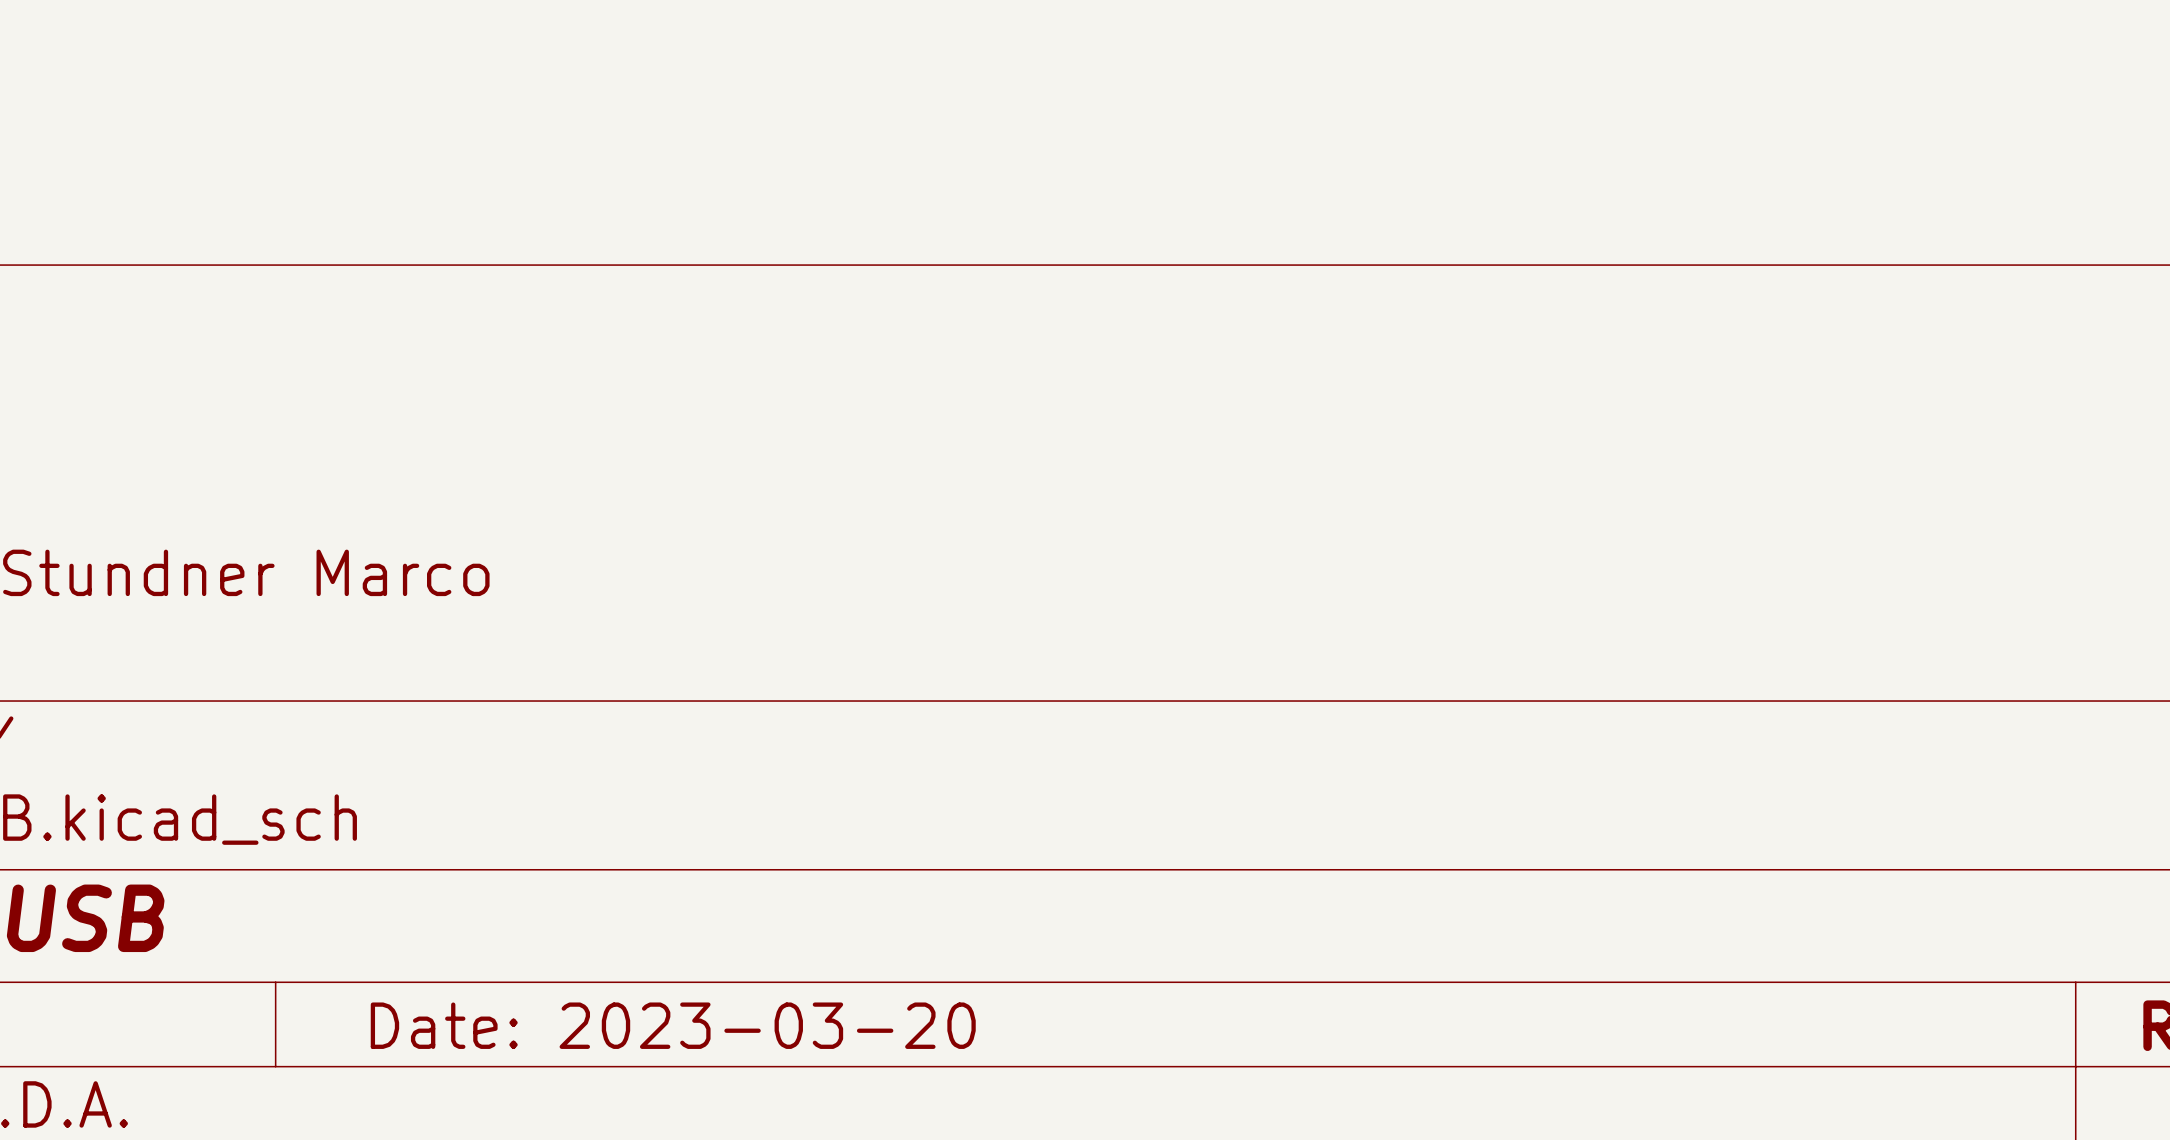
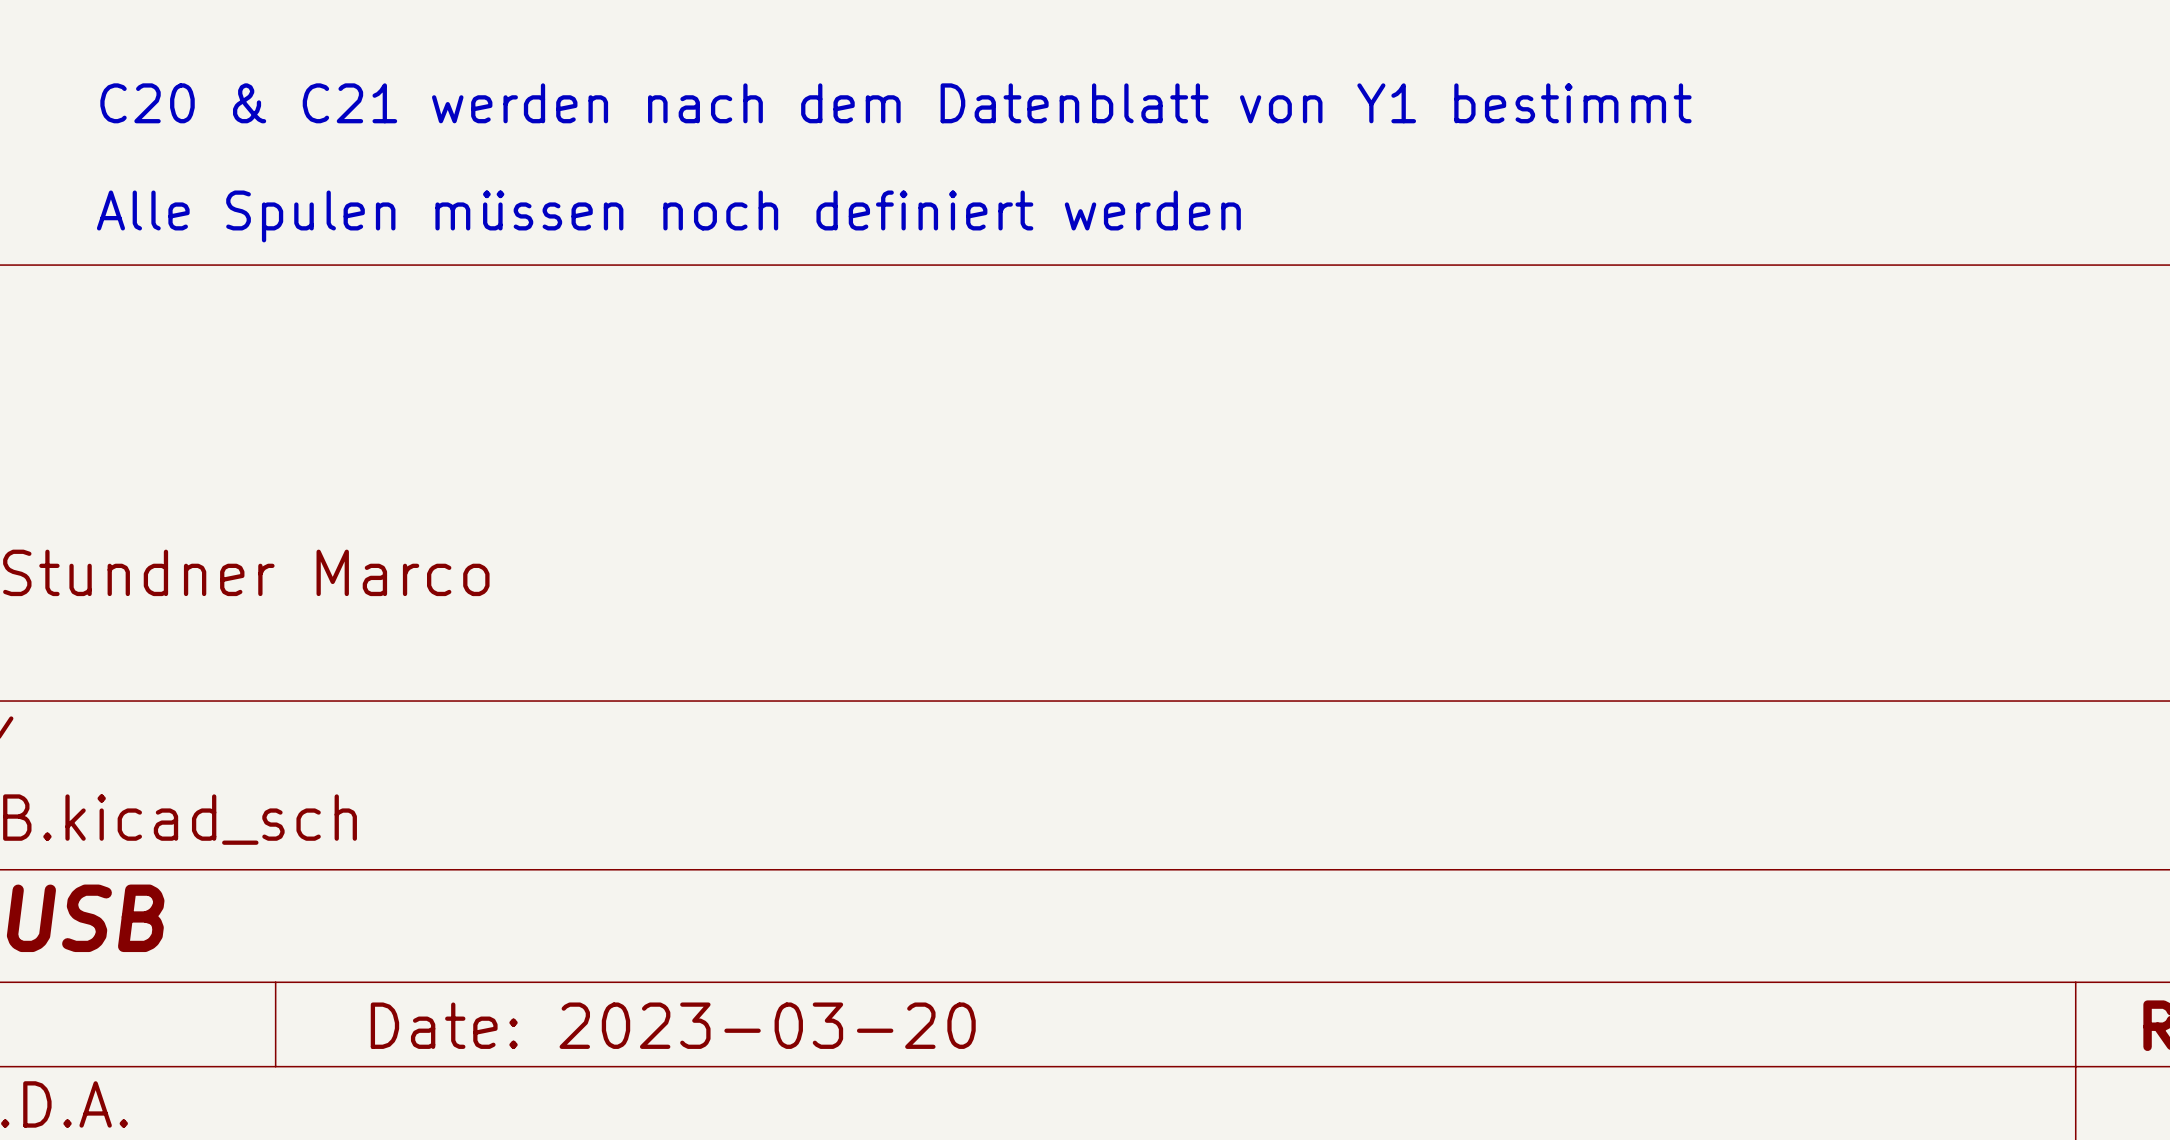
text: none -> C20 & C21 werden nach dem Datenblatt von Y1 bestimmt (895, 103)
text: none -> Alle Spulen müssen noch definiert werden (668, 216)

